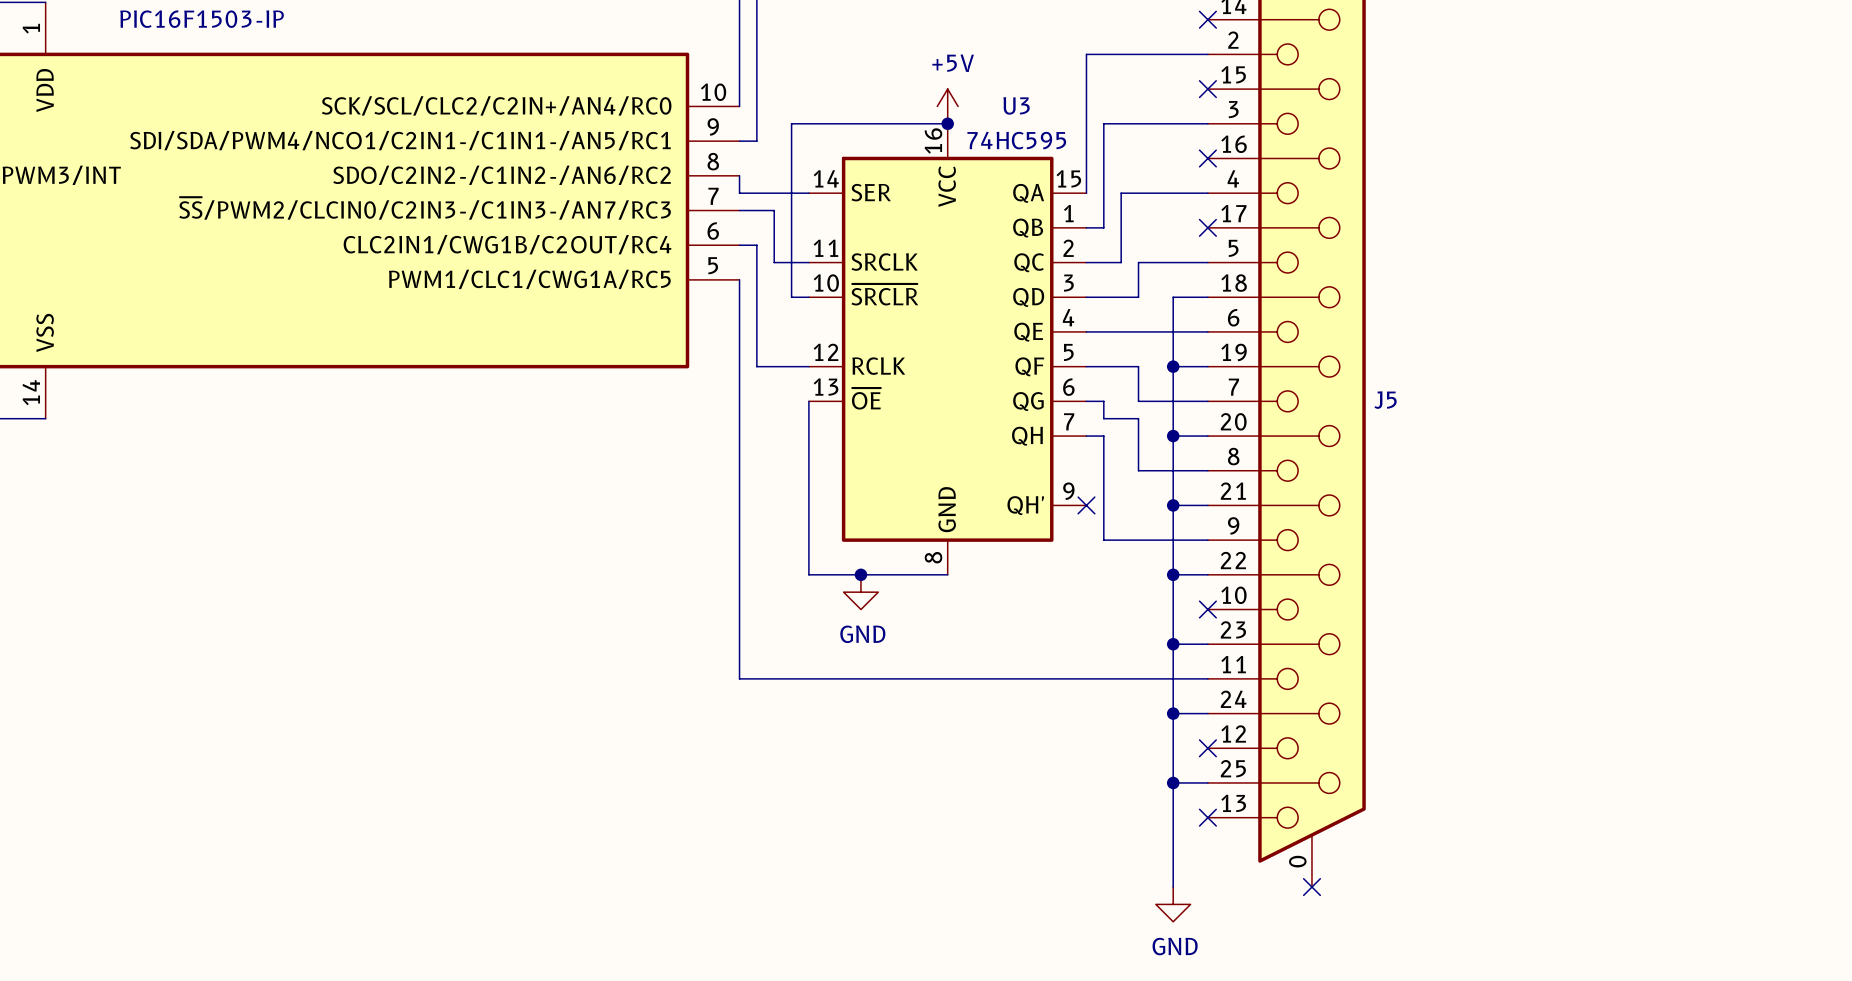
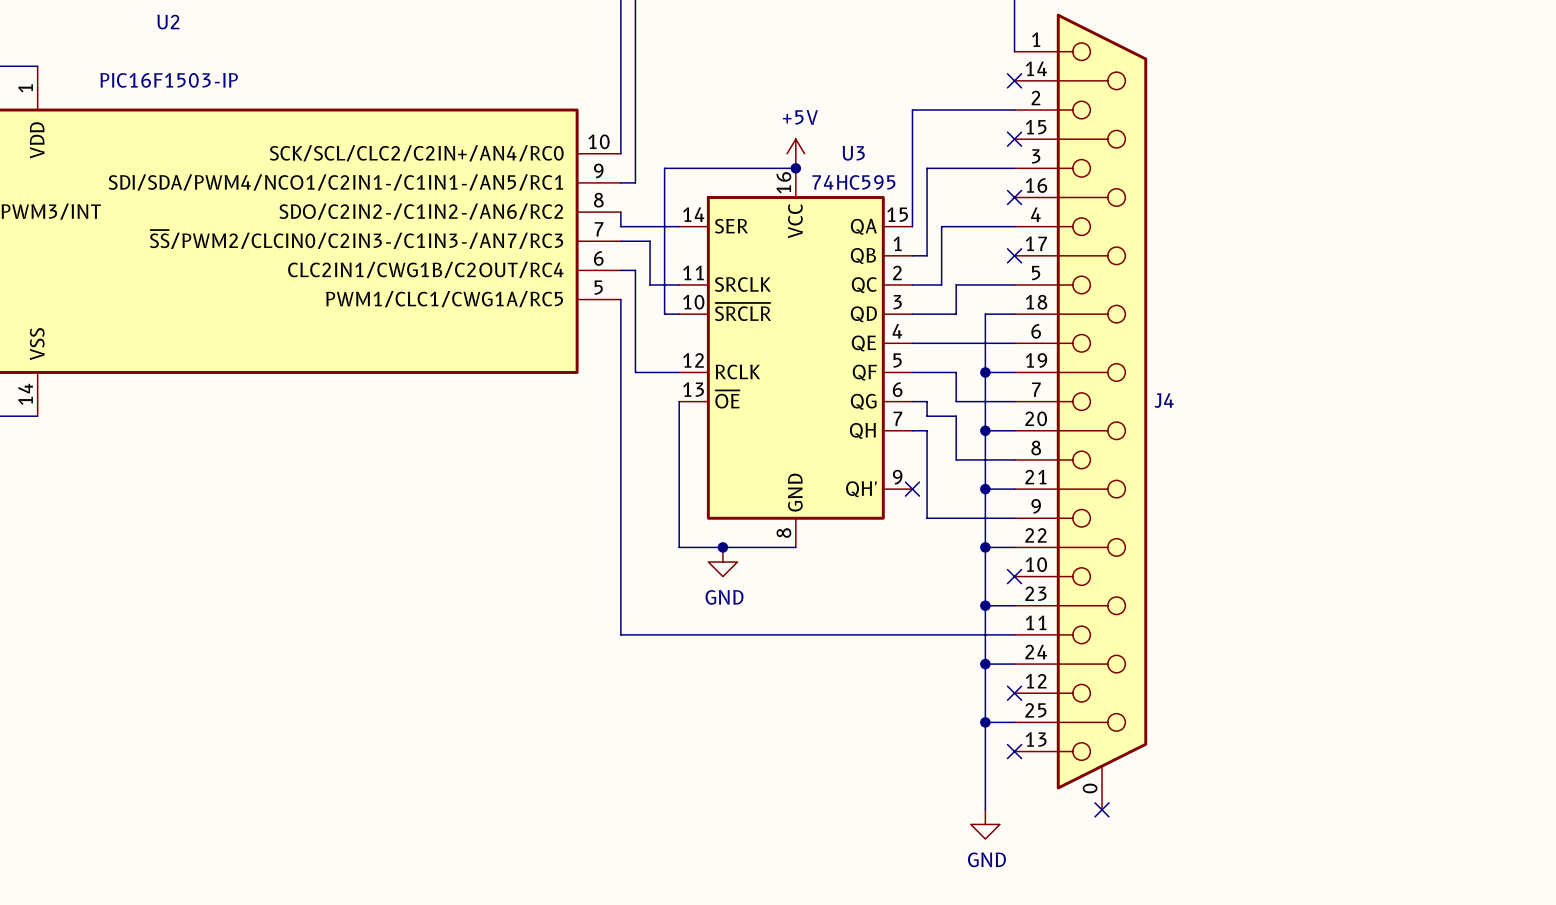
J5 name: J5 (1385, 400) -> J4 (1164, 400)

